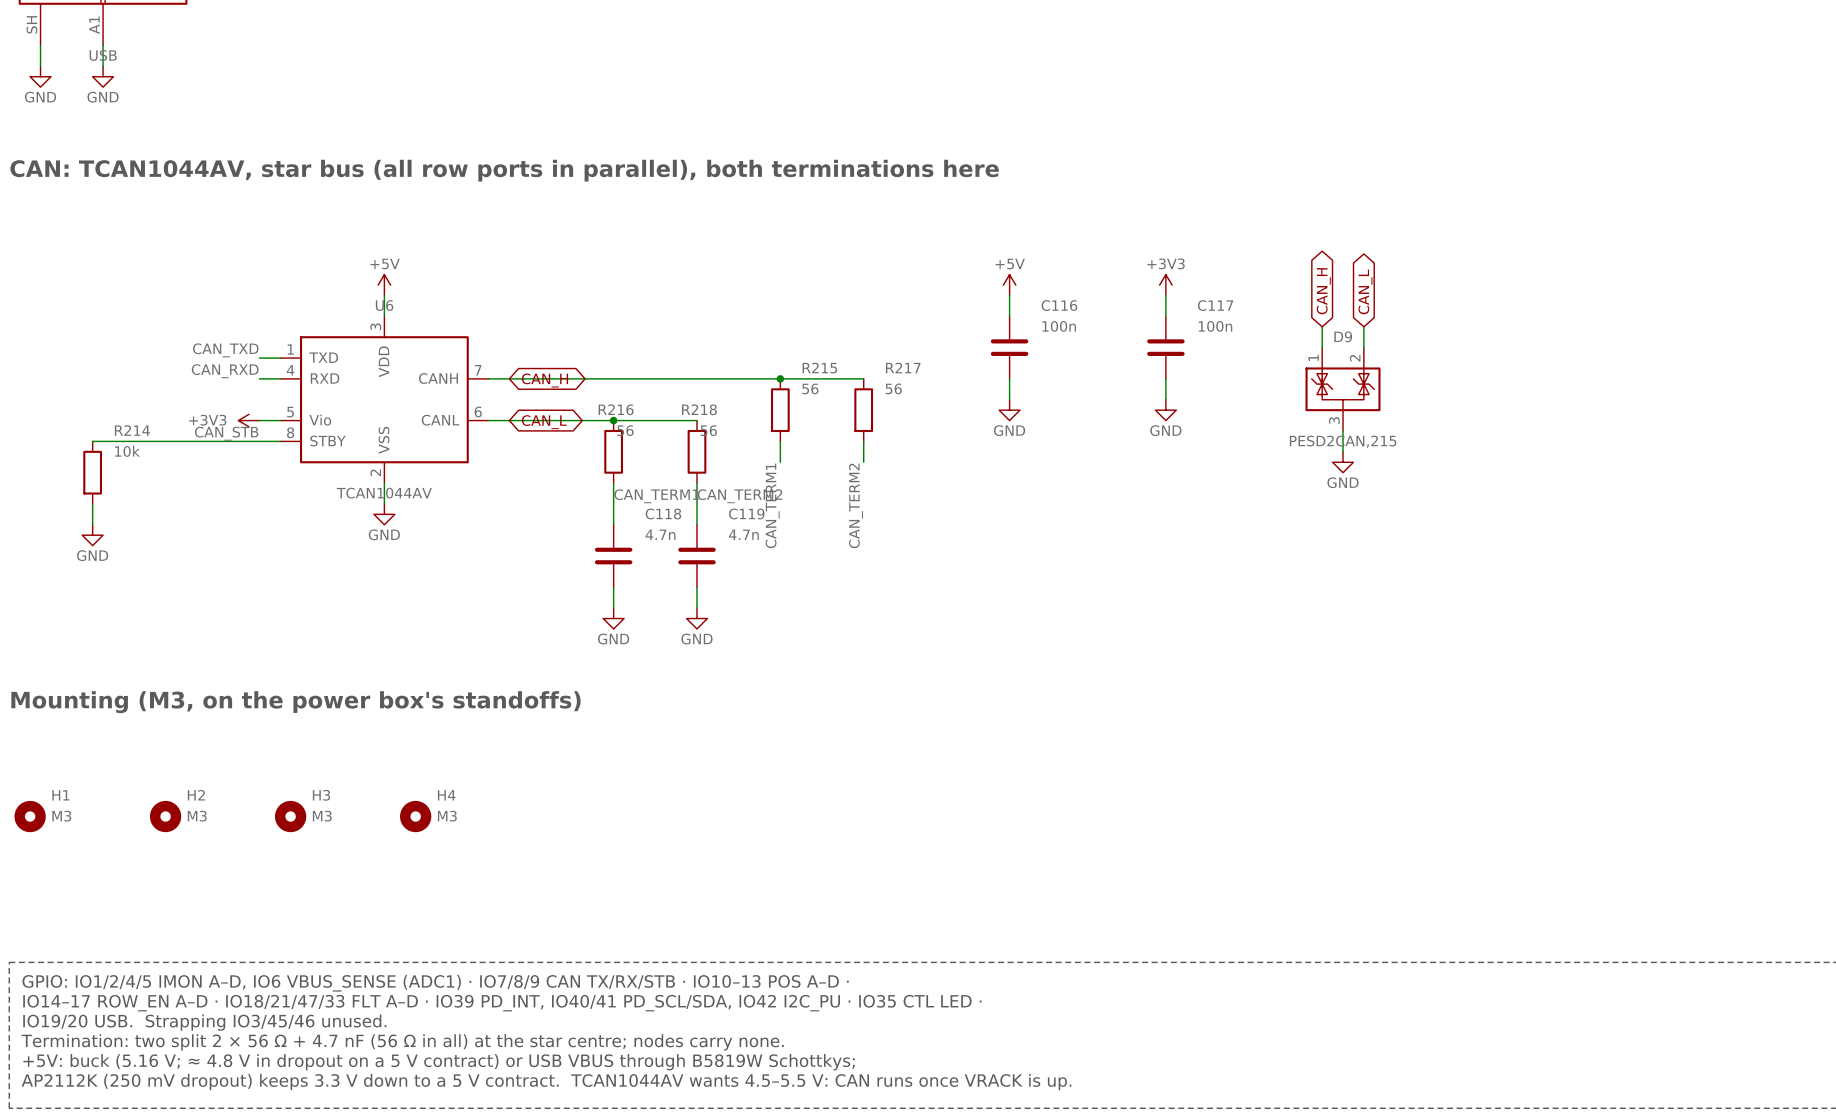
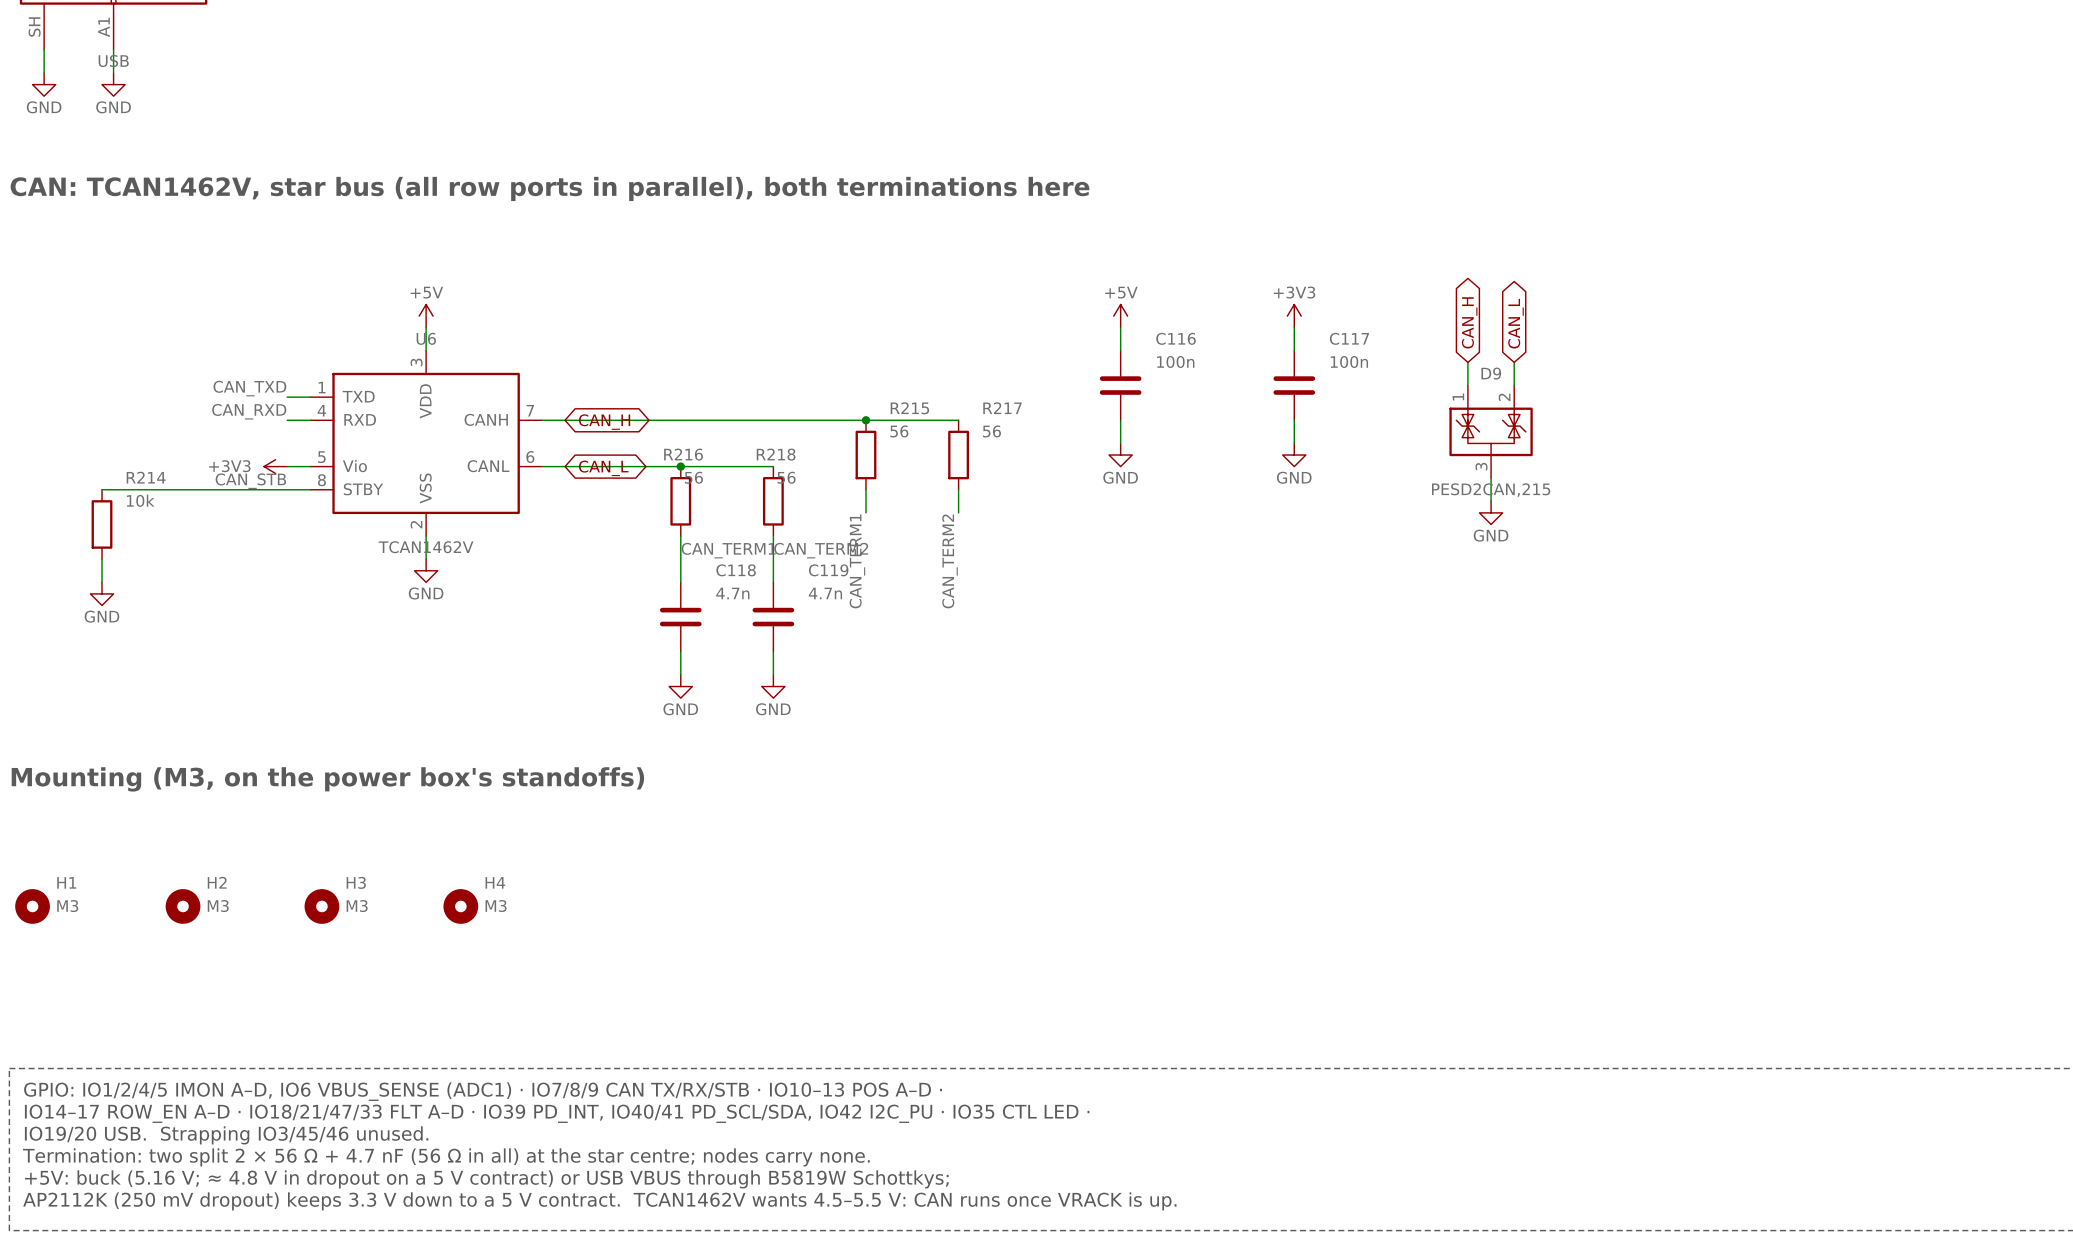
text: CAN: TCAN1044AV, star bus (all row ports in parallel), both terminations here (504, 170) -> CAN: TCAN1462V, star bus (all row ports in parallel), both terminations here (549, 188)
U6 value: TCAN1044AV (384, 493) -> TCAN1462V (426, 547)
text: AP2112K (250 mV dropout) keeps 3.3 V down to a 5 V contract. TCAN1044AV wants 4.5–5.5 V: CAN runs once VRACK is up. (546, 1082) -> AP2112K (250 mV dropout) keeps 3.3 V down to a 5 V contract. TCAN1462V wants 4.5–5.5 V: CAN runs once VRACK is up. (599, 1201)

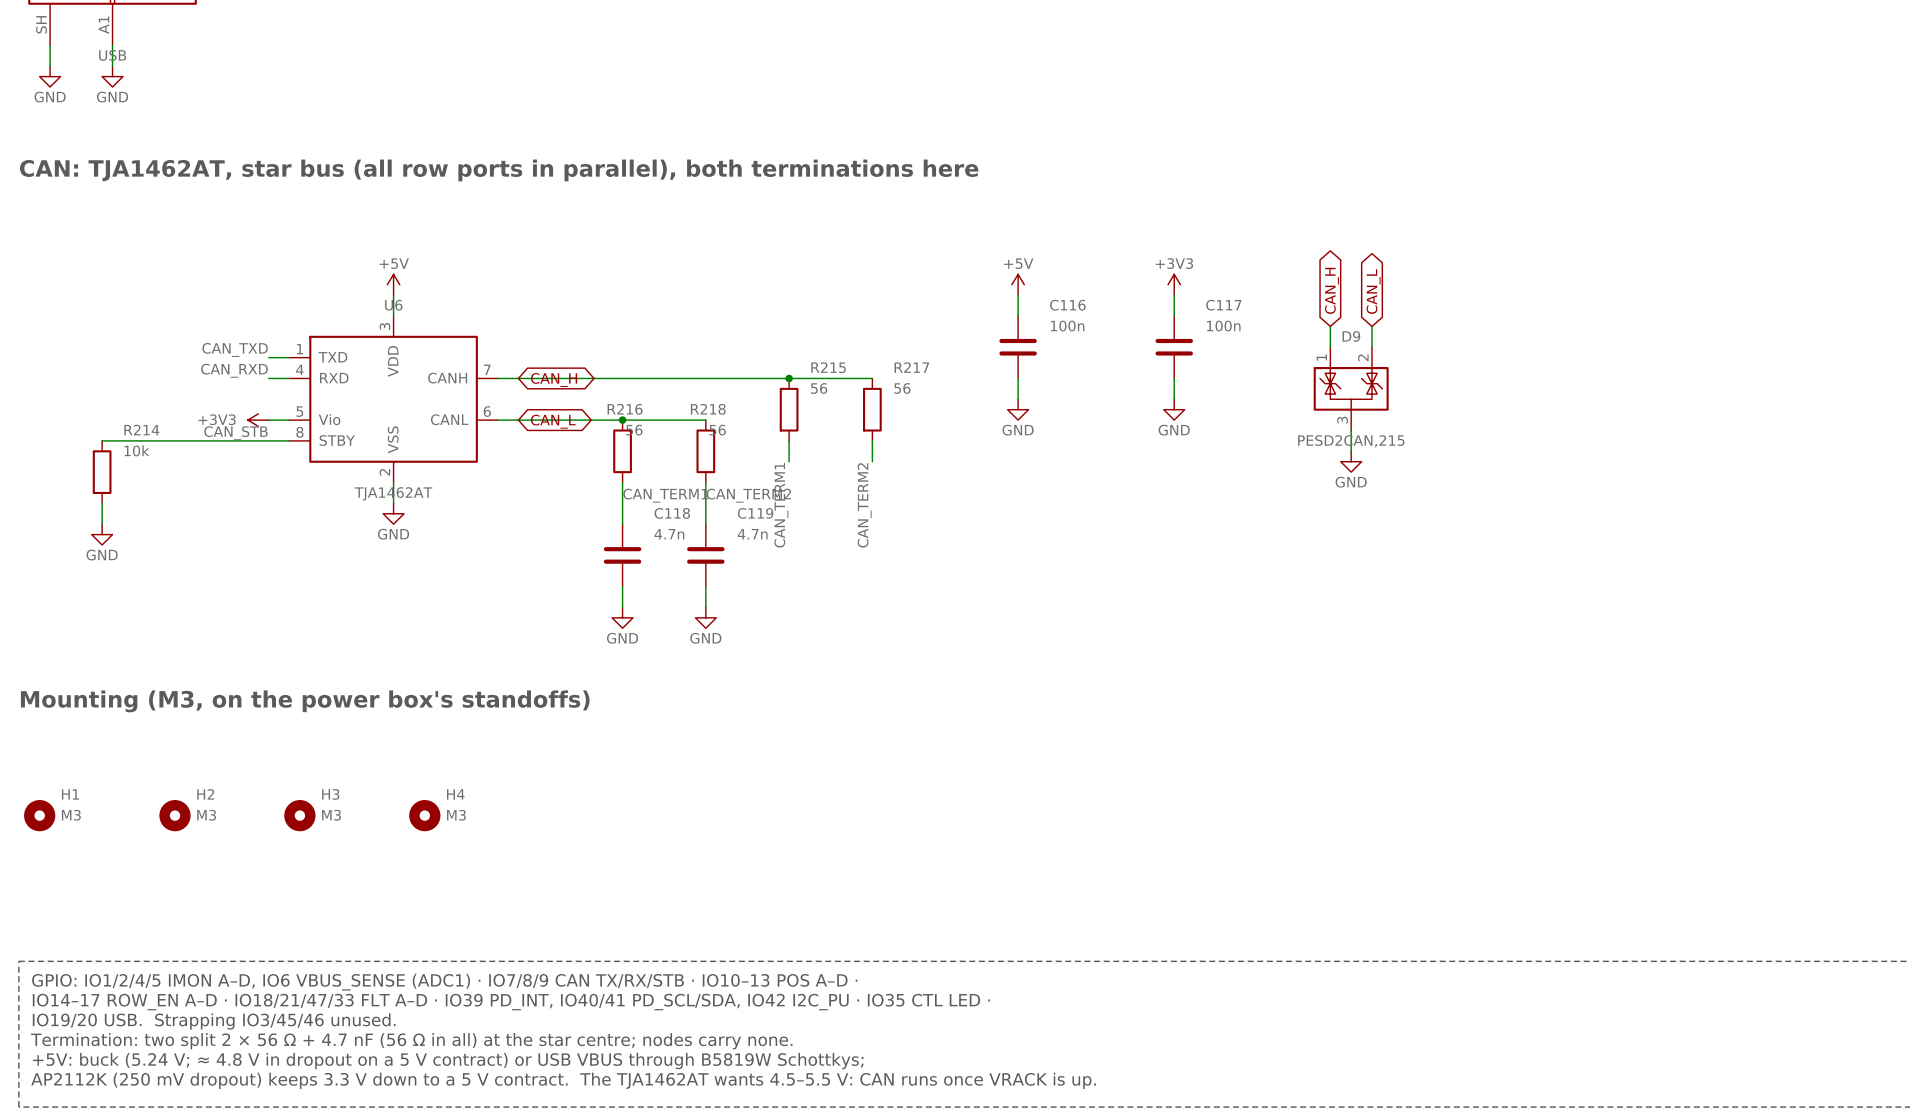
text: CAN: TCAN1462V, star bus (all row ports in parallel), both terminations here (549, 188) -> CAN: TJA1462AT, star bus (all row ports in parallel), both terminations here (499, 170)
U6 value: TCAN1462V (426, 547) -> TJA1462AT (393, 493)
text: +5V: buck (5.16 V; ≈ 4.8 V in dropout on a 5 V contract) or USB VBUS through B5819W Schottkys; (486, 1179) -> +5V: buck (5.24 V; ≈ 4.8 V in dropout on a 5 V contract) or USB VBUS through B5819W Schottkys; (448, 1061)
text: AP2112K (250 mV dropout) keeps 3.3 V down to a 5 V contract. TCAN1462V wants 4.5–5.5 V: CAN runs once VRACK is up. (599, 1201) -> AP2112K (250 mV dropout) keeps 3.3 V down to a 5 V contract. The TJA1462AT wants 4.5–5.5 V: CAN runs once VRACK is up. (563, 1080)

